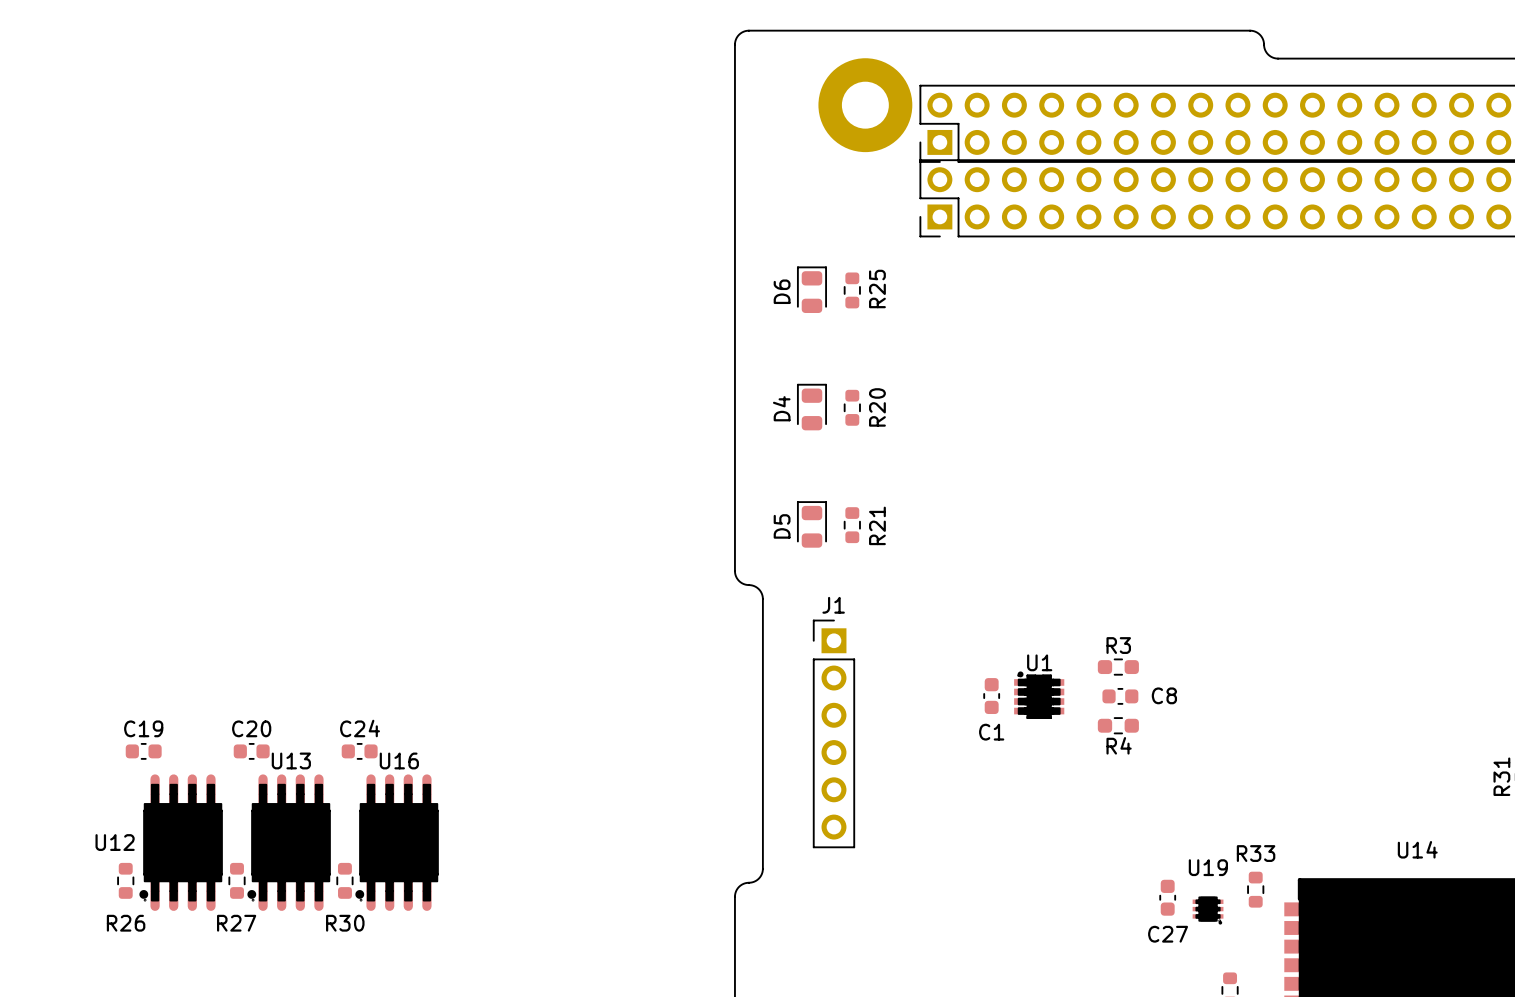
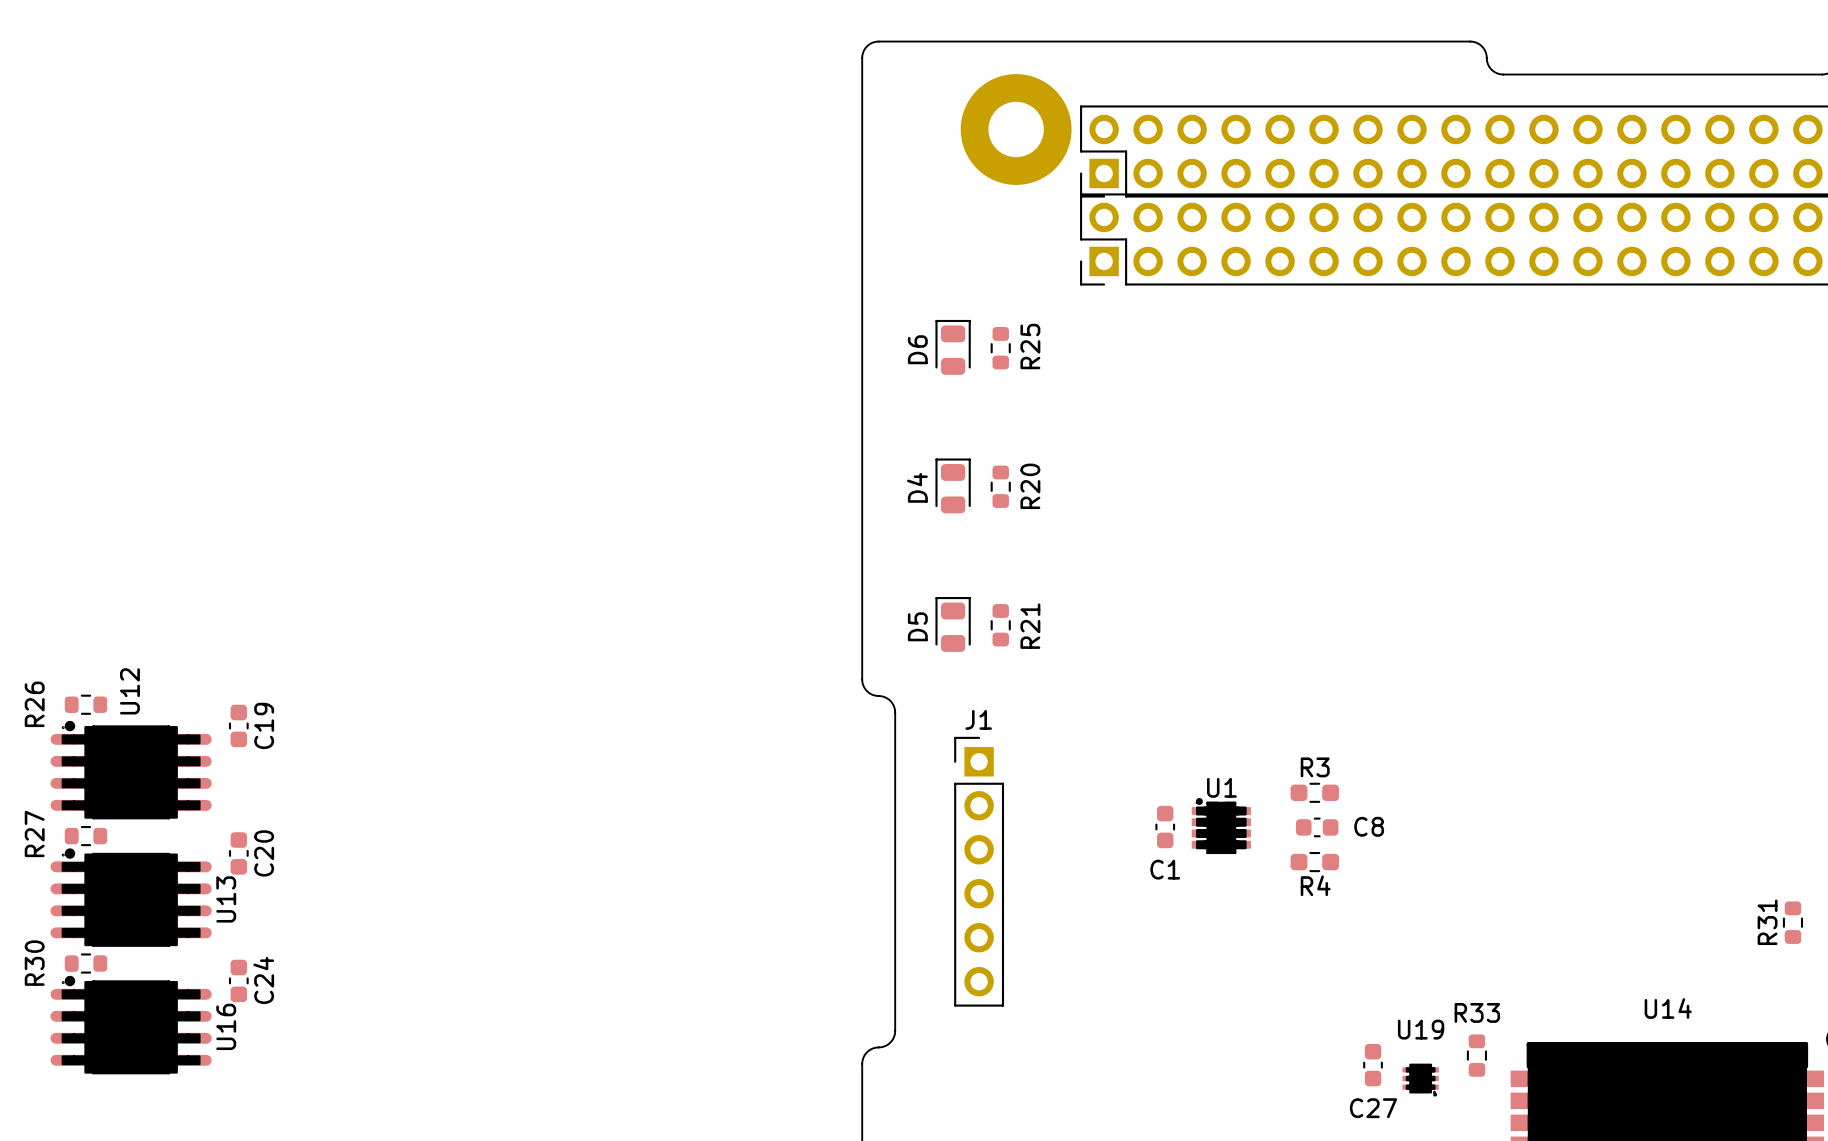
C19 rotation: 0° (143, 751) -> 90° clockwise (238, 725)
C19 position: (143, 751) -> (238, 725)
C20 rotation: 0° (251, 751) -> 90° clockwise (238, 853)
C20 position: (251, 751) -> (238, 853)
C24 rotation: 0° (359, 751) -> 90° clockwise (238, 980)
C24 position: (359, 751) -> (238, 980)
U12 rotation: 0° (181, 842) -> 90° clockwise (131, 770)
U12 position: (181, 842) -> (131, 770)
U13 rotation: 0° (289, 842) -> 90° clockwise (131, 897)
U13 position: (289, 842) -> (131, 897)
U16 rotation: 0° (397, 842) -> 90° clockwise (131, 1025)
U16 position: (397, 842) -> (131, 1025)
R26 rotation: 0° (125, 880) -> 90° clockwise (86, 704)
R26 position: (125, 880) -> (86, 704)
R27 rotation: 0° (237, 880) -> 90° clockwise (86, 836)
R27 position: (237, 880) -> (86, 836)
R30 rotation: 0° (344, 880) -> 90° clockwise (86, 963)
R30 position: (344, 880) -> (86, 963)

